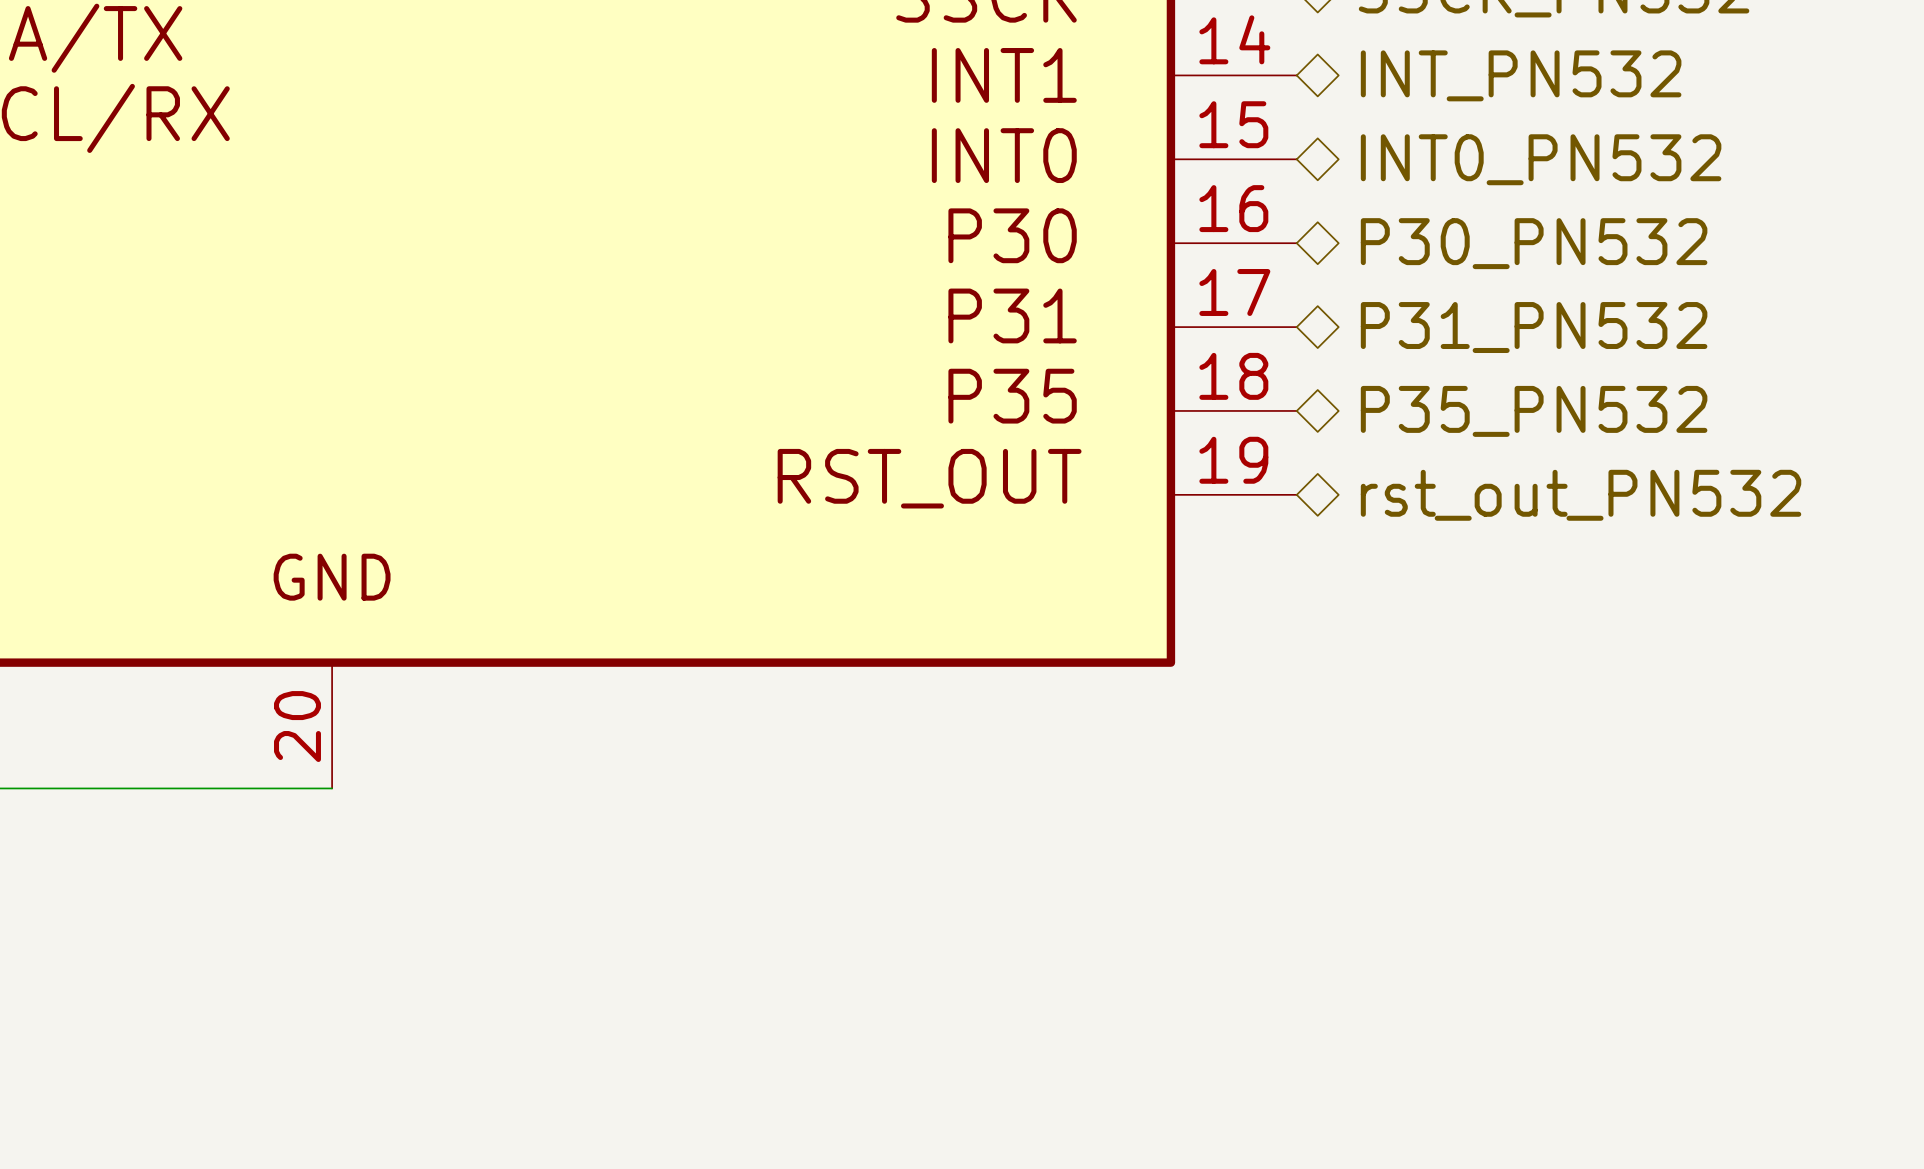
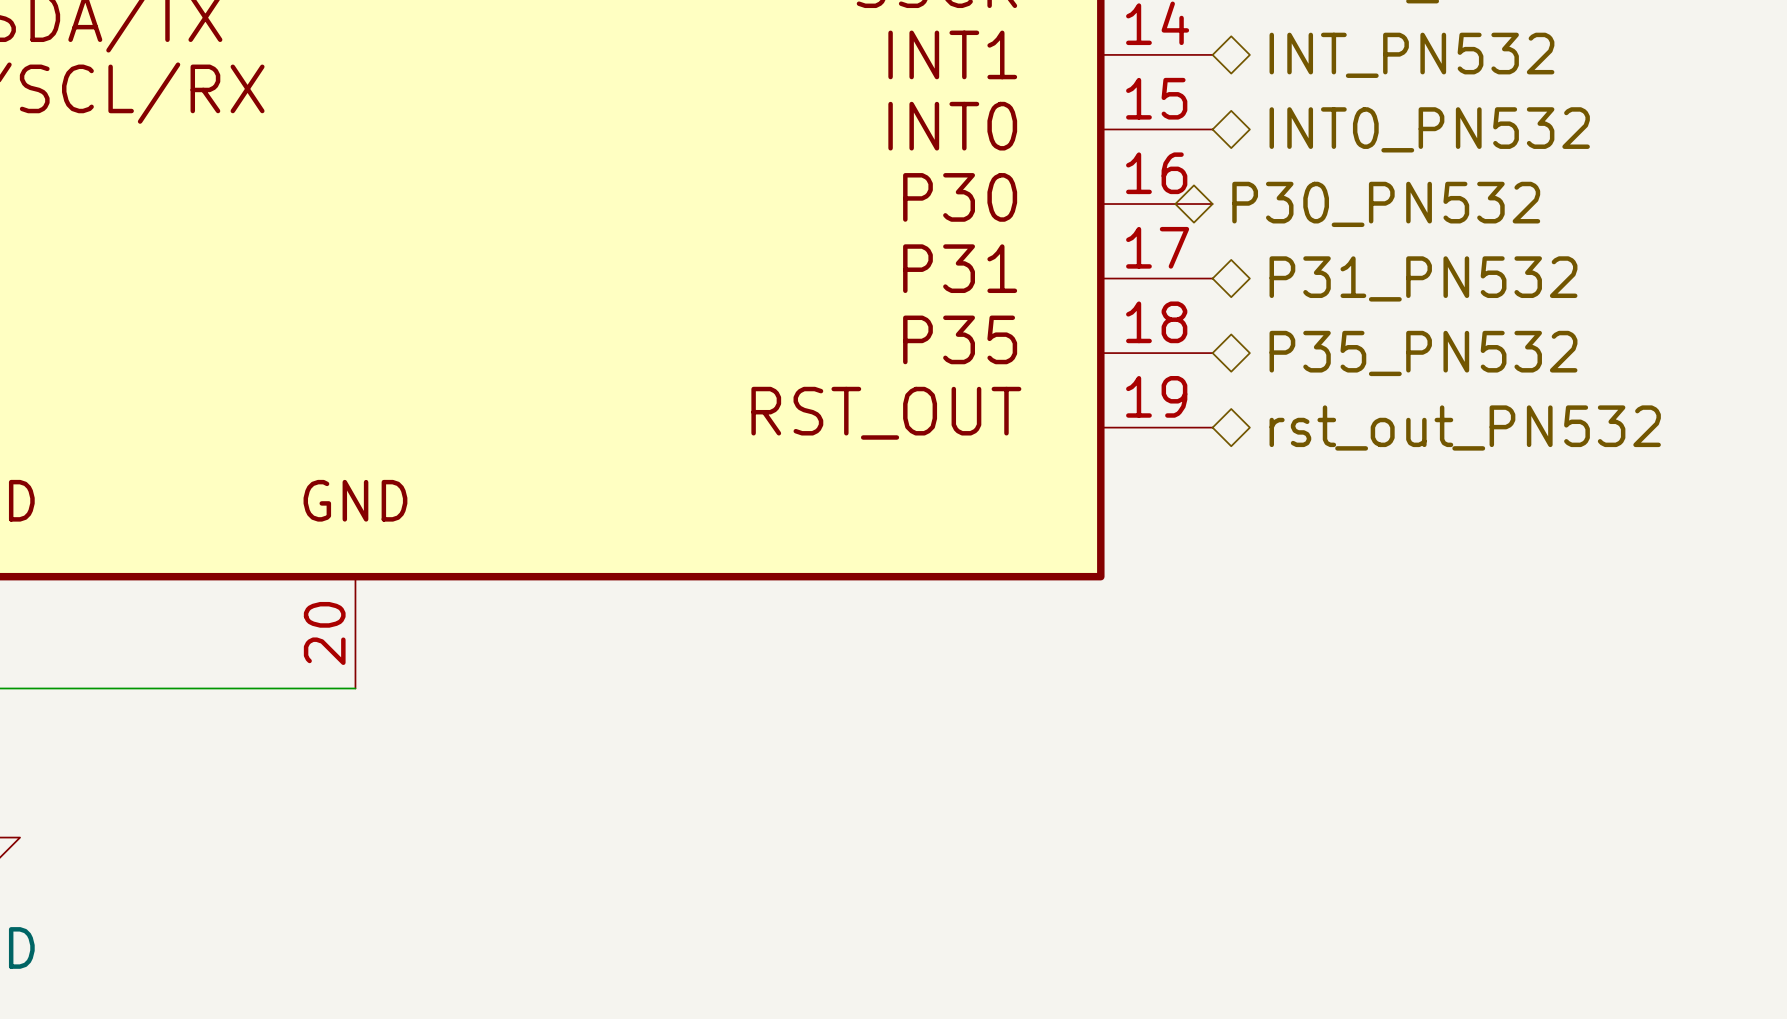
hierarchical label position: P30_PN532 (1534, 243) -> P30_PN532 (1386, 204)

